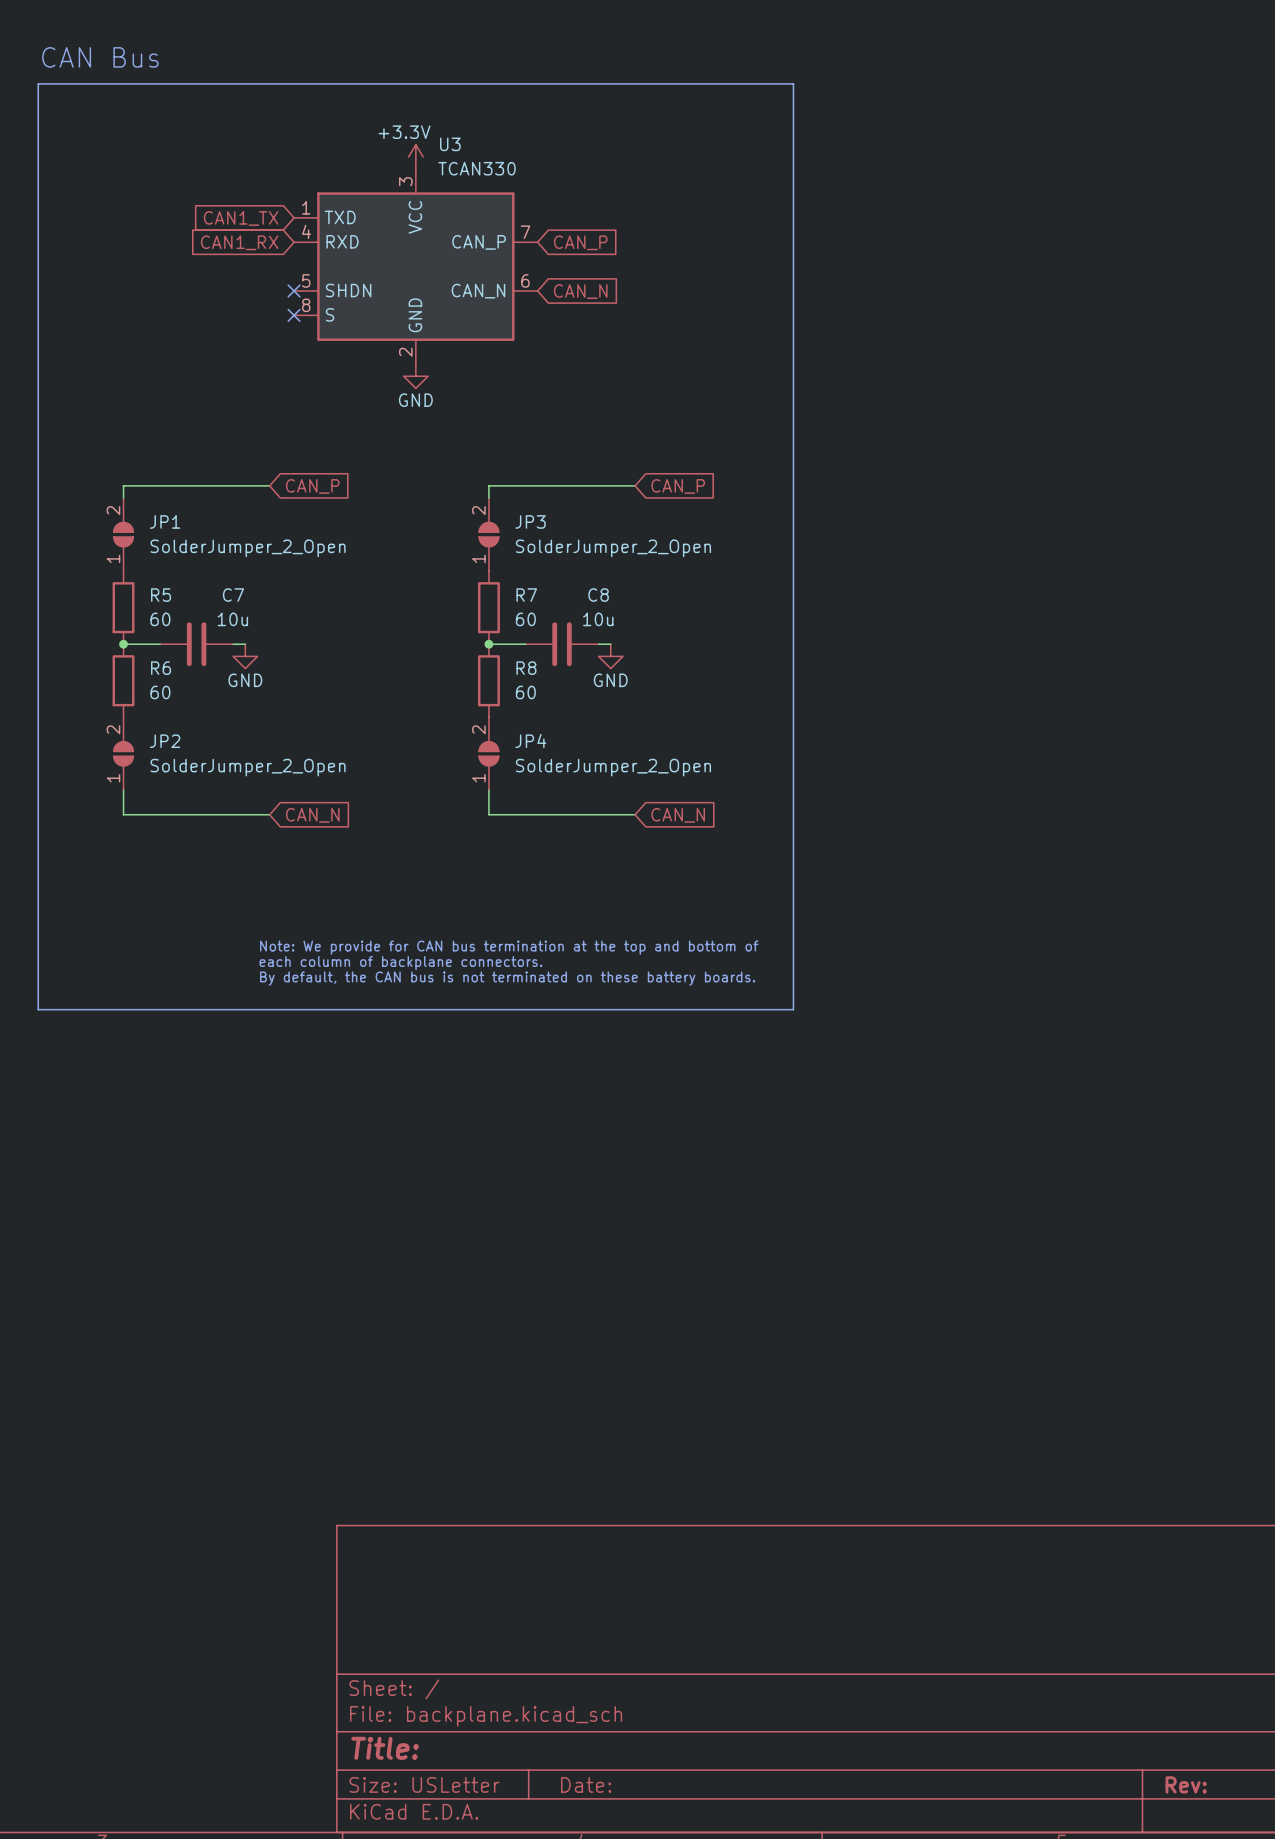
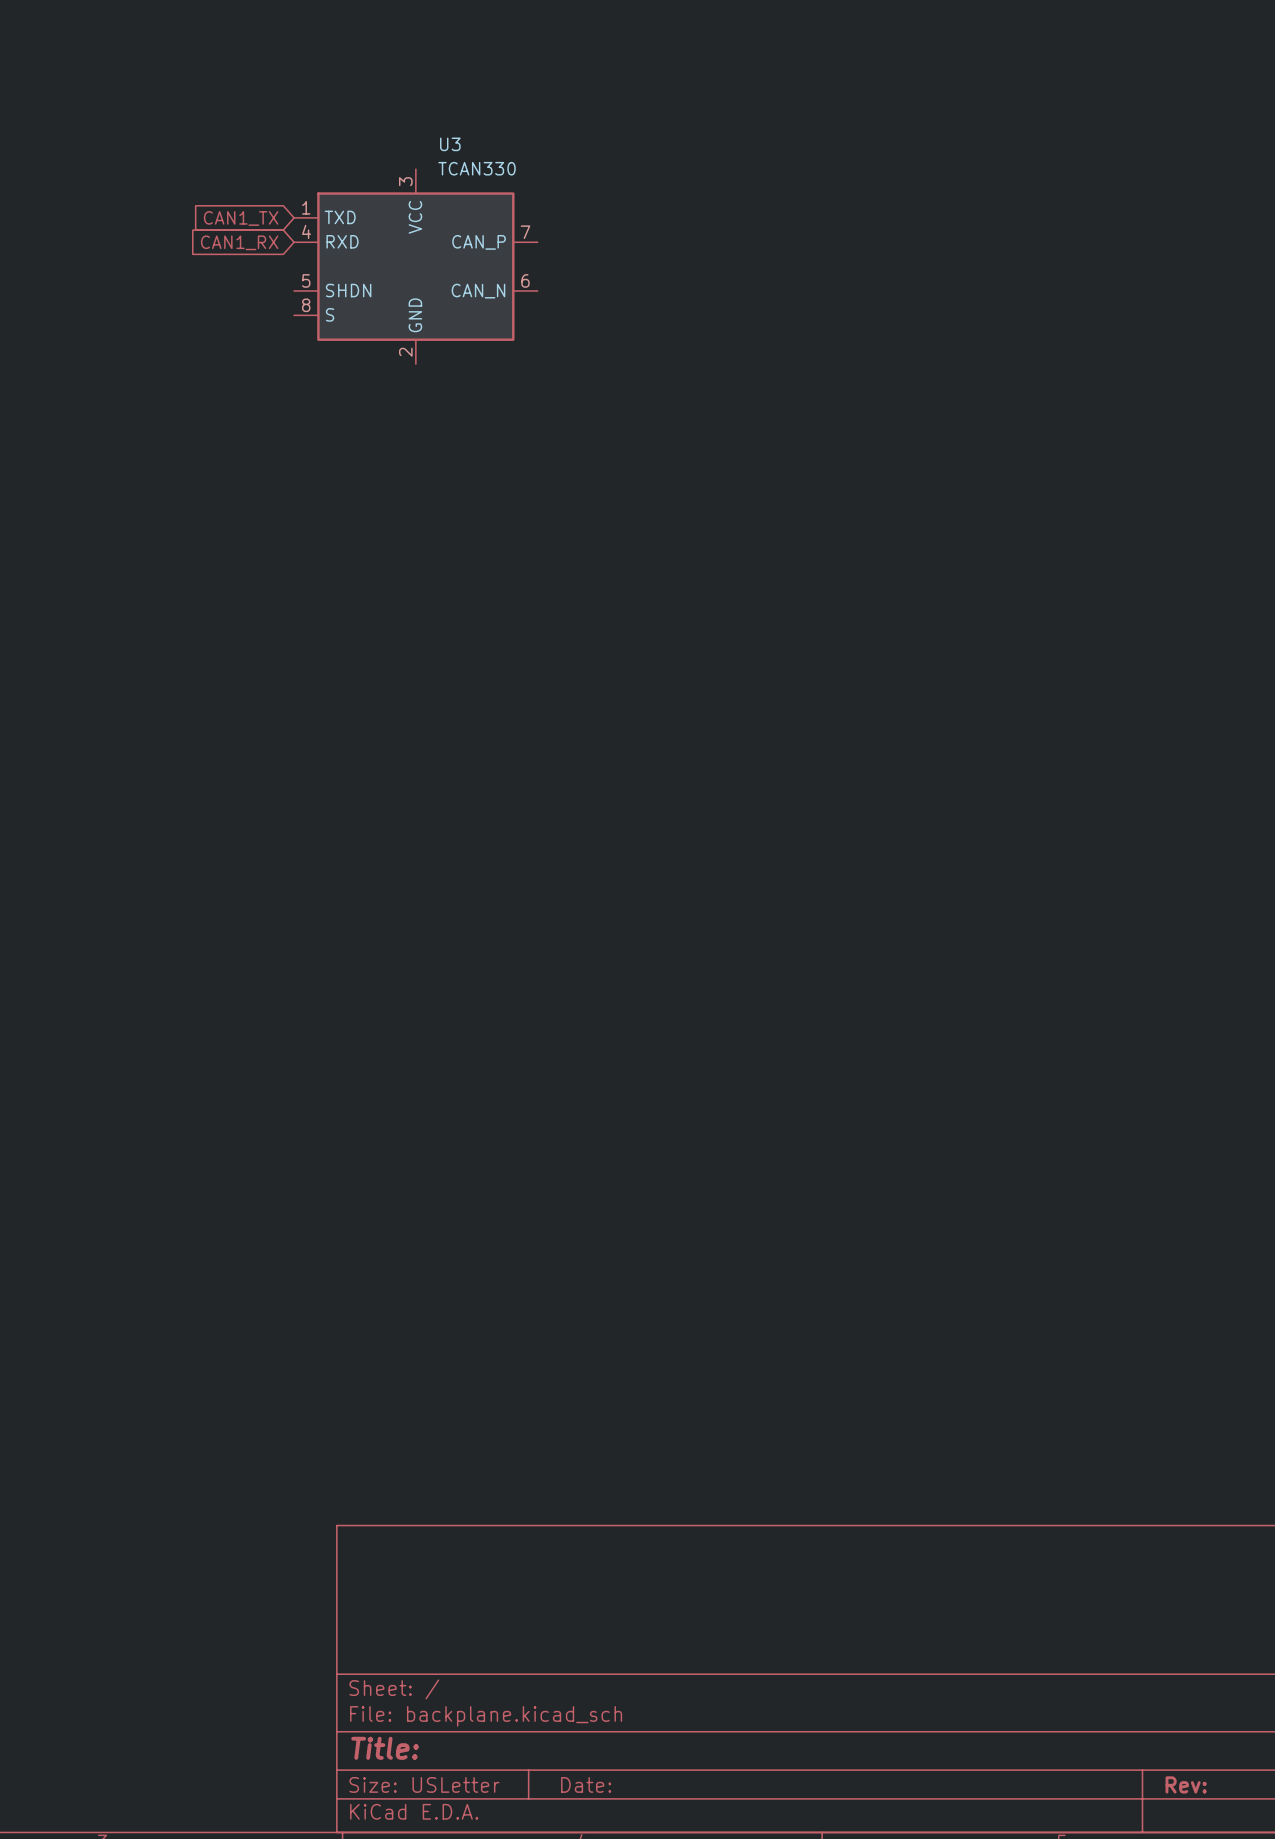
text: CAN Bus (100, 57) -> none
line: (38, 83) (793, 83) (793, 1009) (38, 1009) (38, 83) -> none
power symbol: +3.3V (415, 157) -> none
global label: CAN_P (580, 242) -> none
no-connect mark: (294, 290) -> none
global label: CAN_N (580, 291) -> none
no-connect mark: (294, 315) -> none
power symbol: GND (415, 376) -> none
wire: (269, 485) (123, 485) (123, 498) -> none
wire: (635, 485) (488, 485) (488, 498) -> none
global label: CAN_P (312, 486) -> none
global label: CAN_P (678, 486) -> none
JP1: SolderJumper_2_Open (123, 534) -> none
JP3: SolderJumper_2_Open (488, 534) -> none
R5: 60 (123, 607) -> none
R7: 60 (488, 607) -> none
wire: (123, 644) (160, 644) -> none
junction: (123, 644) -> none
C7: 10u (196, 644) -> none
wire: (233, 644) (245, 644) -> none
wire: (488, 644) (525, 644) -> none
junction: (488, 644) -> none
C8: 10u (562, 644) -> none
wire: (598, 644) (610, 644) -> none
power symbol: GND (245, 656) -> none
power symbol: GND (610, 656) -> none
R6: 60 (123, 680) -> none
R8: 60 (488, 680) -> none
JP2: SolderJumper_2_Open (123, 753) -> none
JP4: SolderJumper_2_Open (488, 753) -> none
wire: (123, 790) (123, 814) (269, 814) -> none
wire: (488, 790) (488, 814) (635, 814) -> none
global label: CAN_N (312, 815) -> none
global label: CAN_N (678, 815) -> none
text: Note: We provide for CAN bus termination at the top and bottom of (509, 947) -> none
text: each column of backplane connectors. (400, 963) -> none
text: By default, the CAN bus is not terminated on these battery boards. (507, 978) -> none

